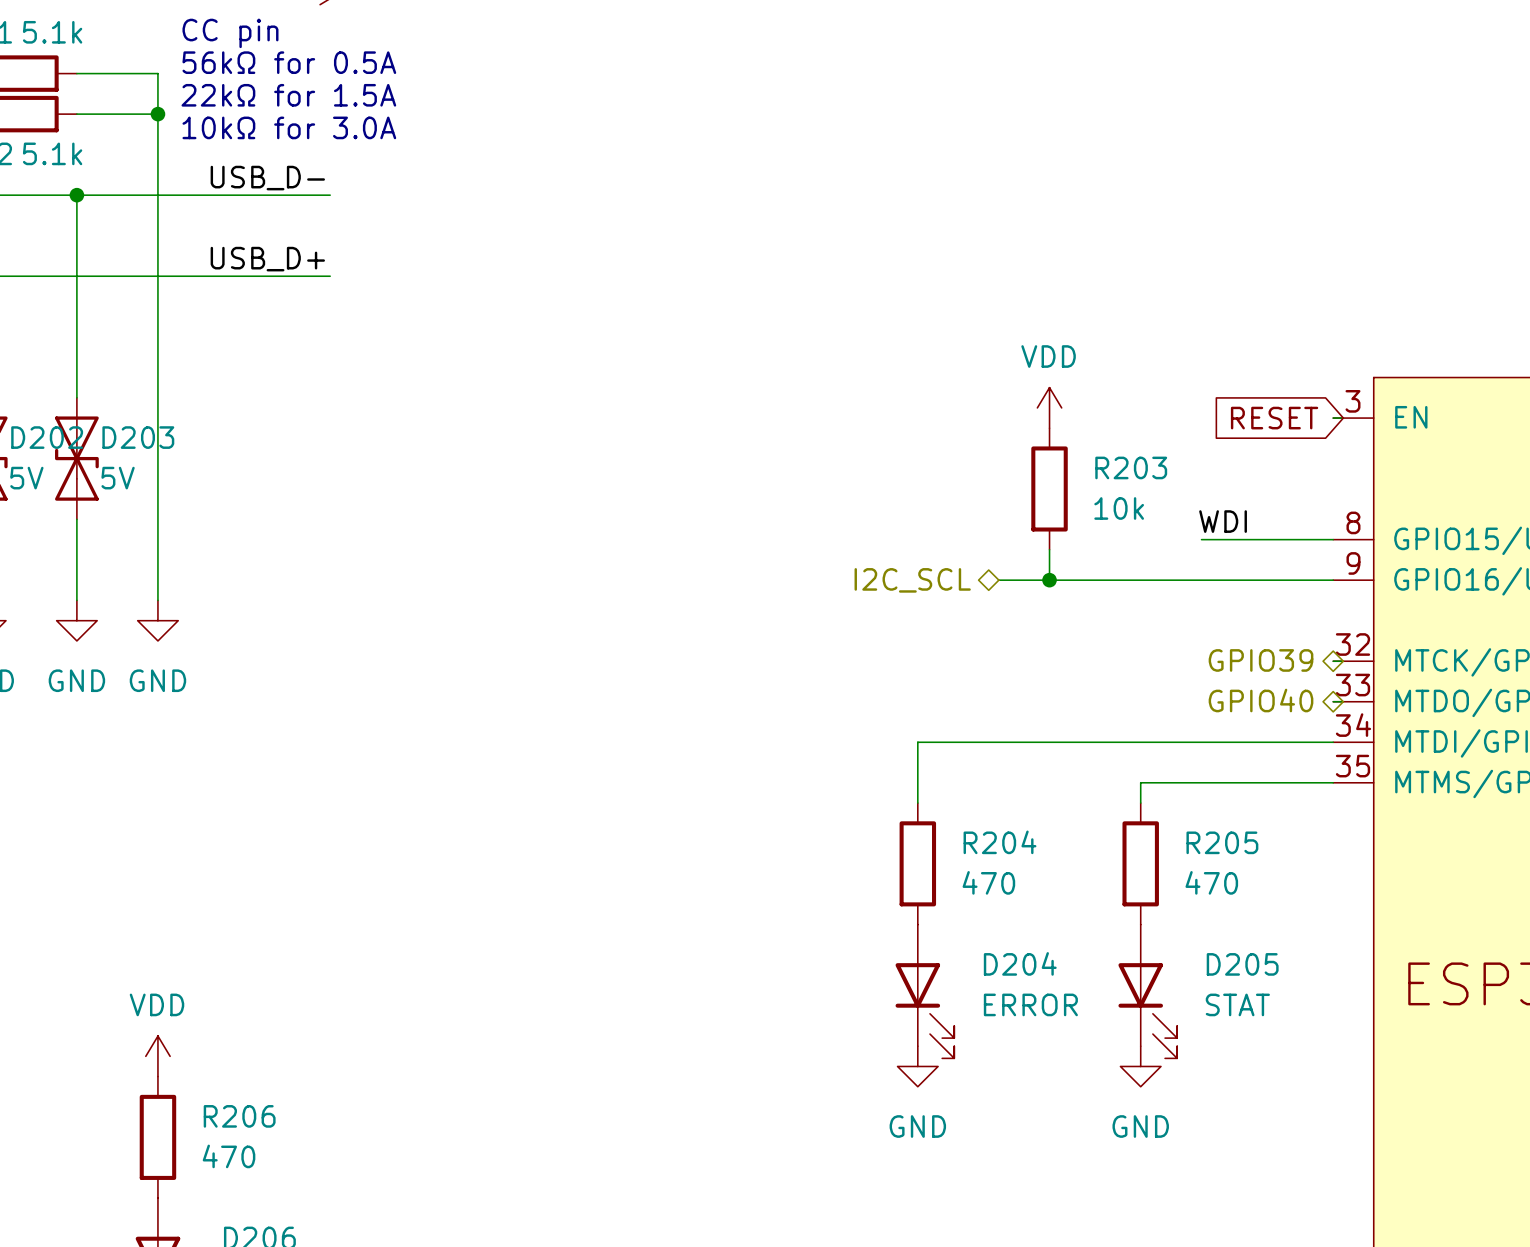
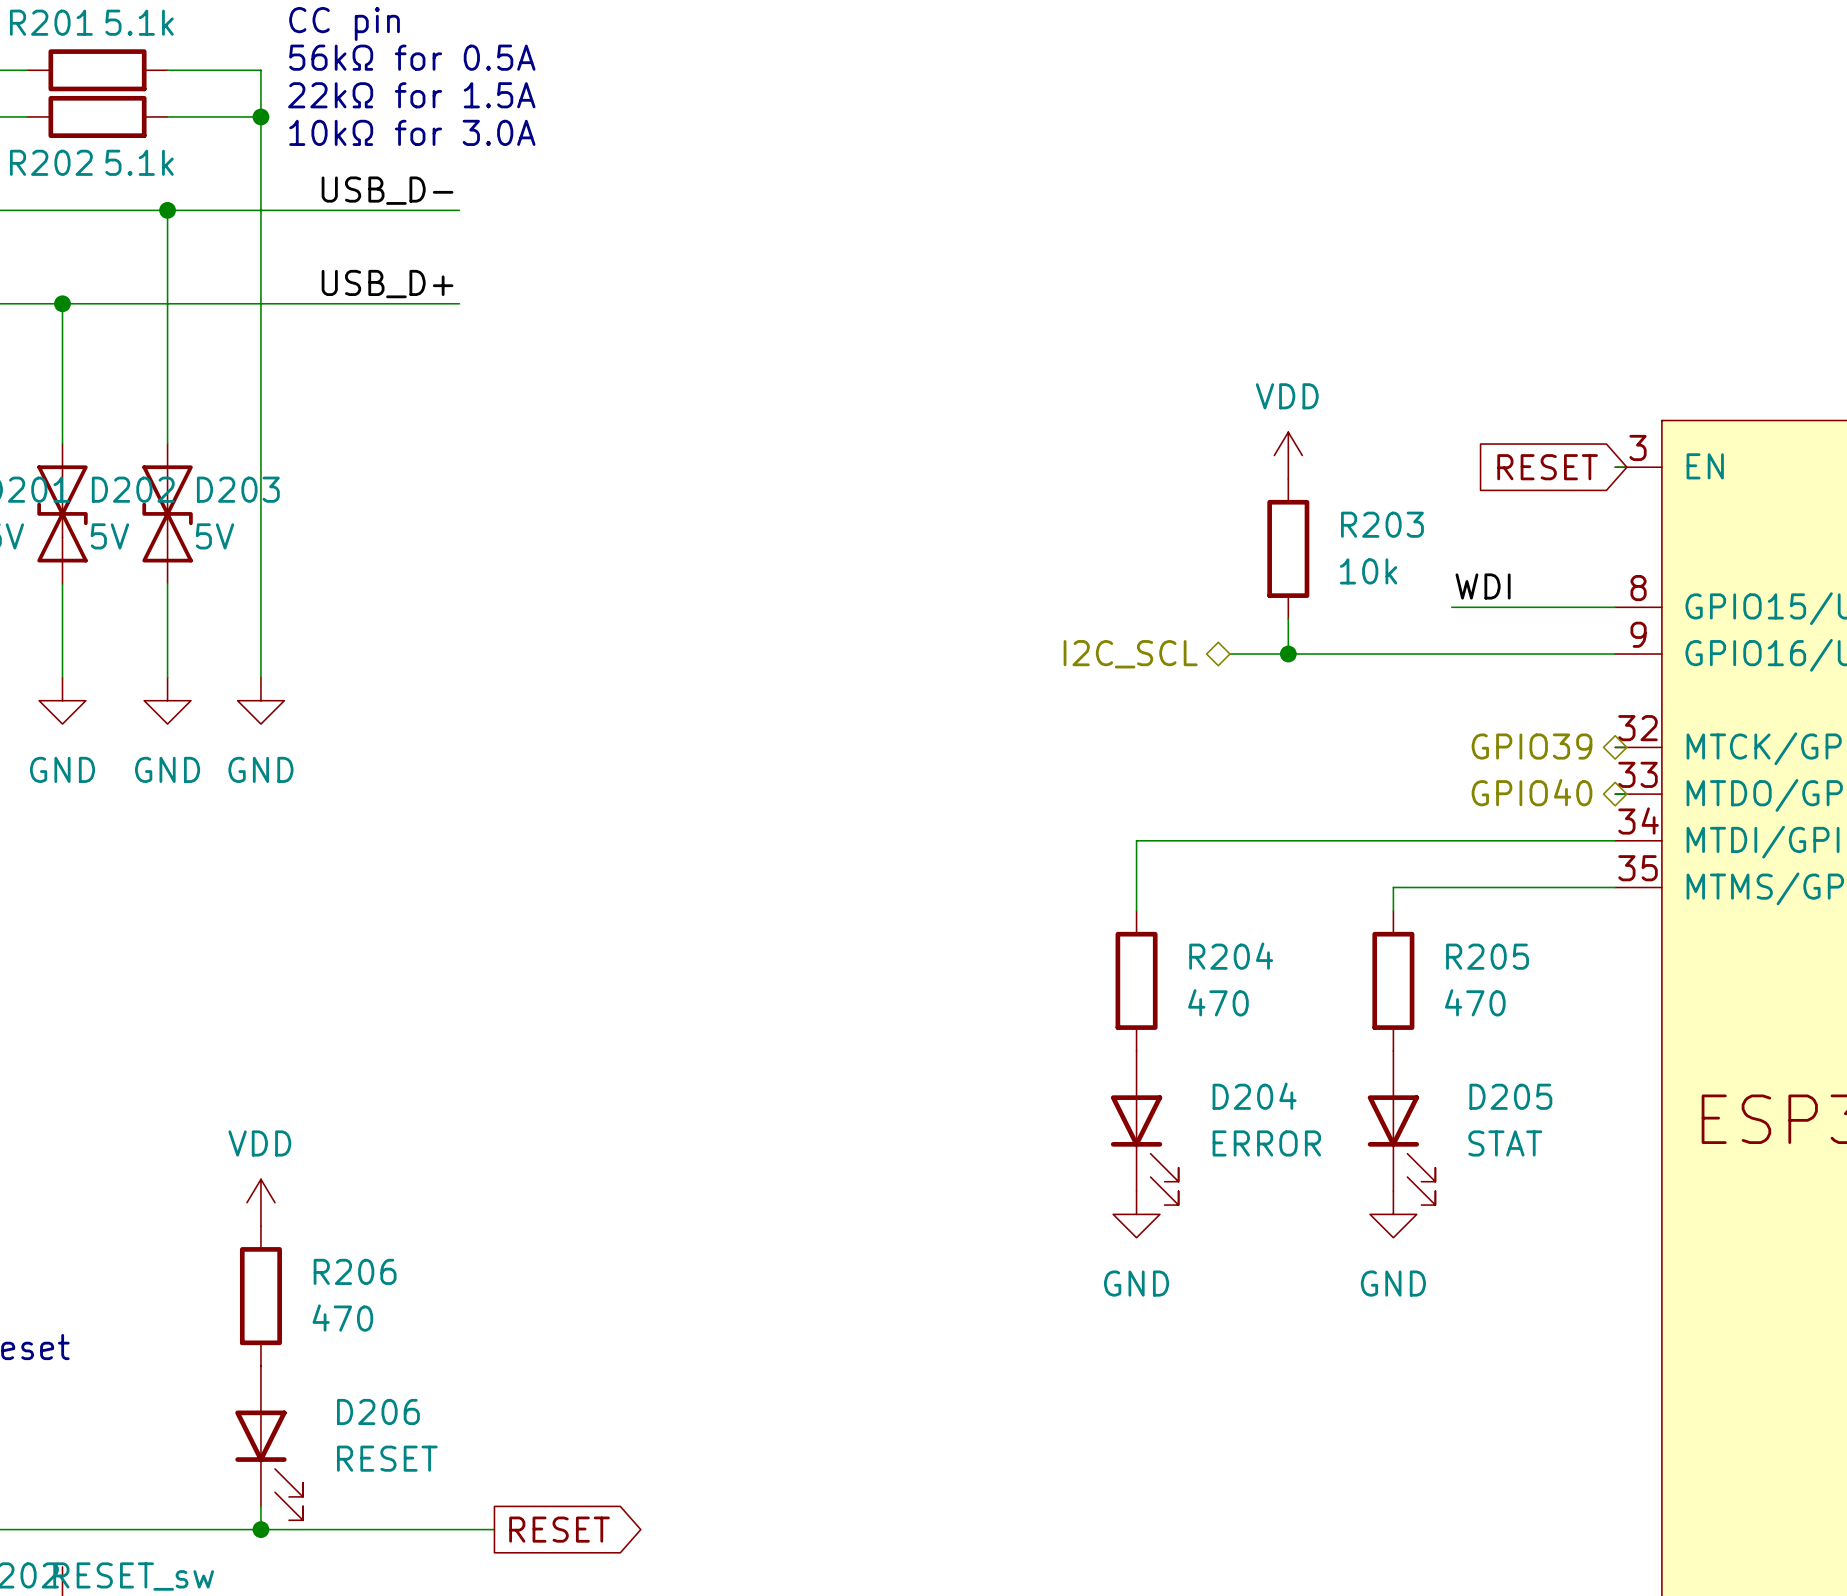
label position: WDI (1223, 521) -> WDI (1483, 586)
wire: none -> (1451, 607) (1463, 607)

